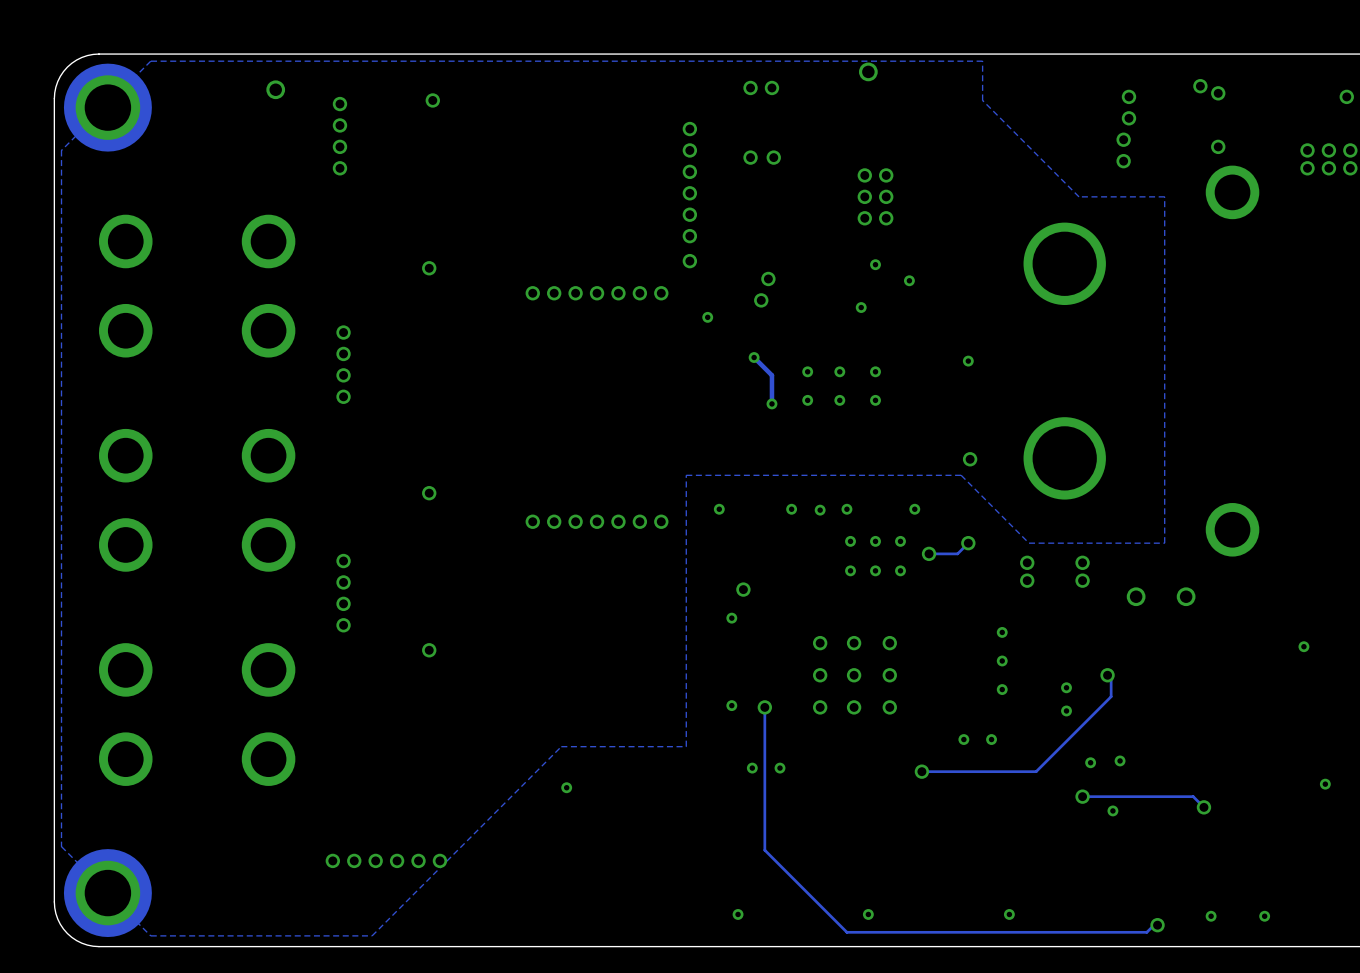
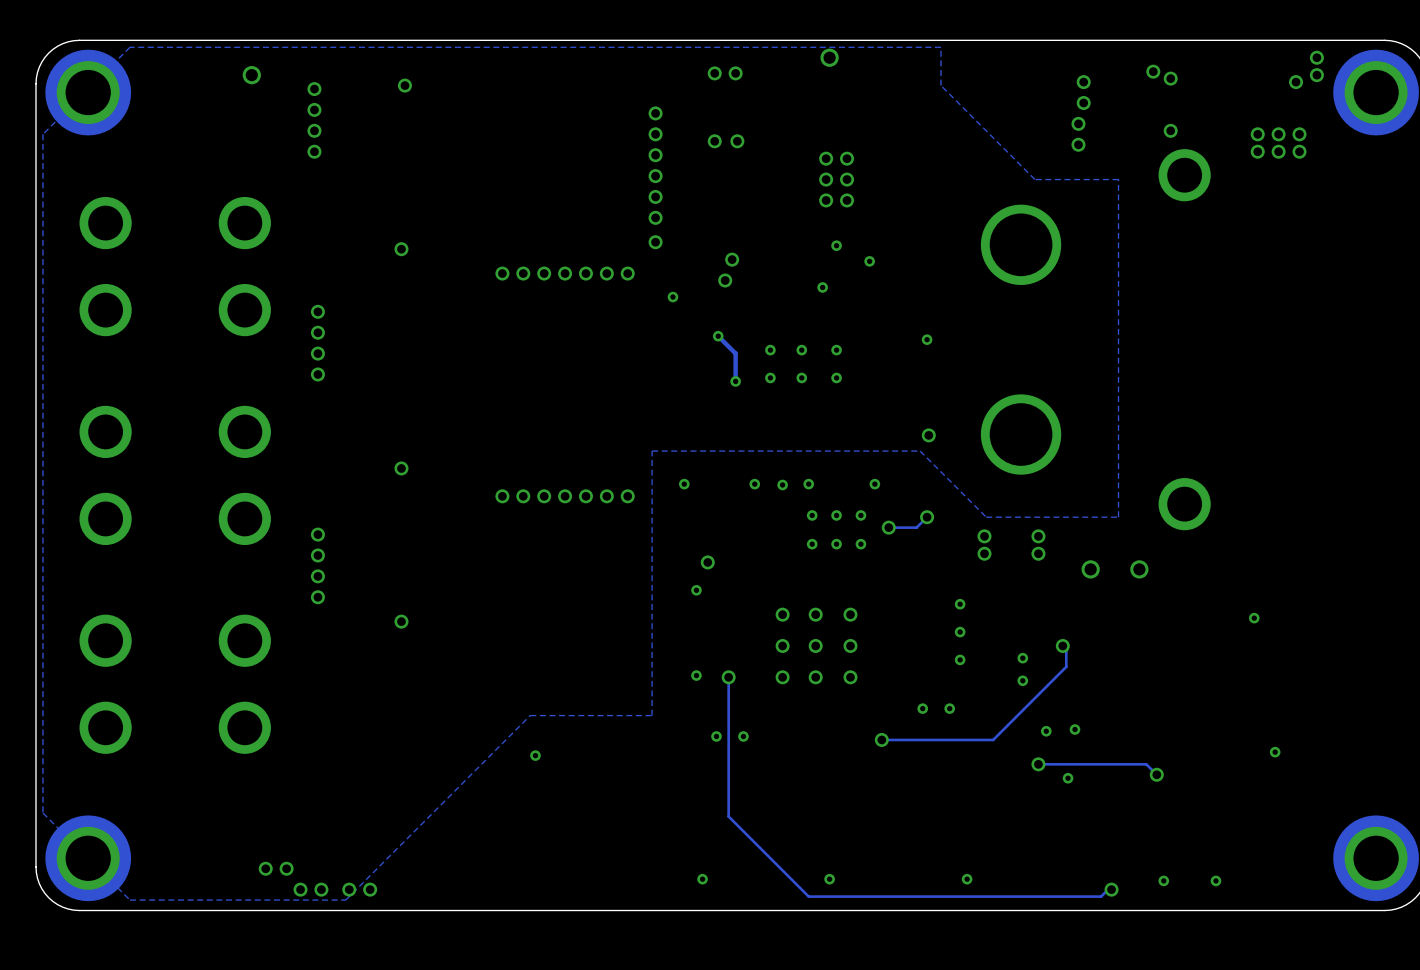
via: (332, 860) -> none
via: (354, 860) -> none
via: (375, 860) -> none
via: (397, 860) -> none
via: (418, 860) -> none
via: (439, 860) -> none
via: none -> (265, 868)
via: none -> (286, 868)
via: none -> (300, 889)
via: none -> (321, 889)
via: none -> (349, 889)
via: none -> (370, 889)

